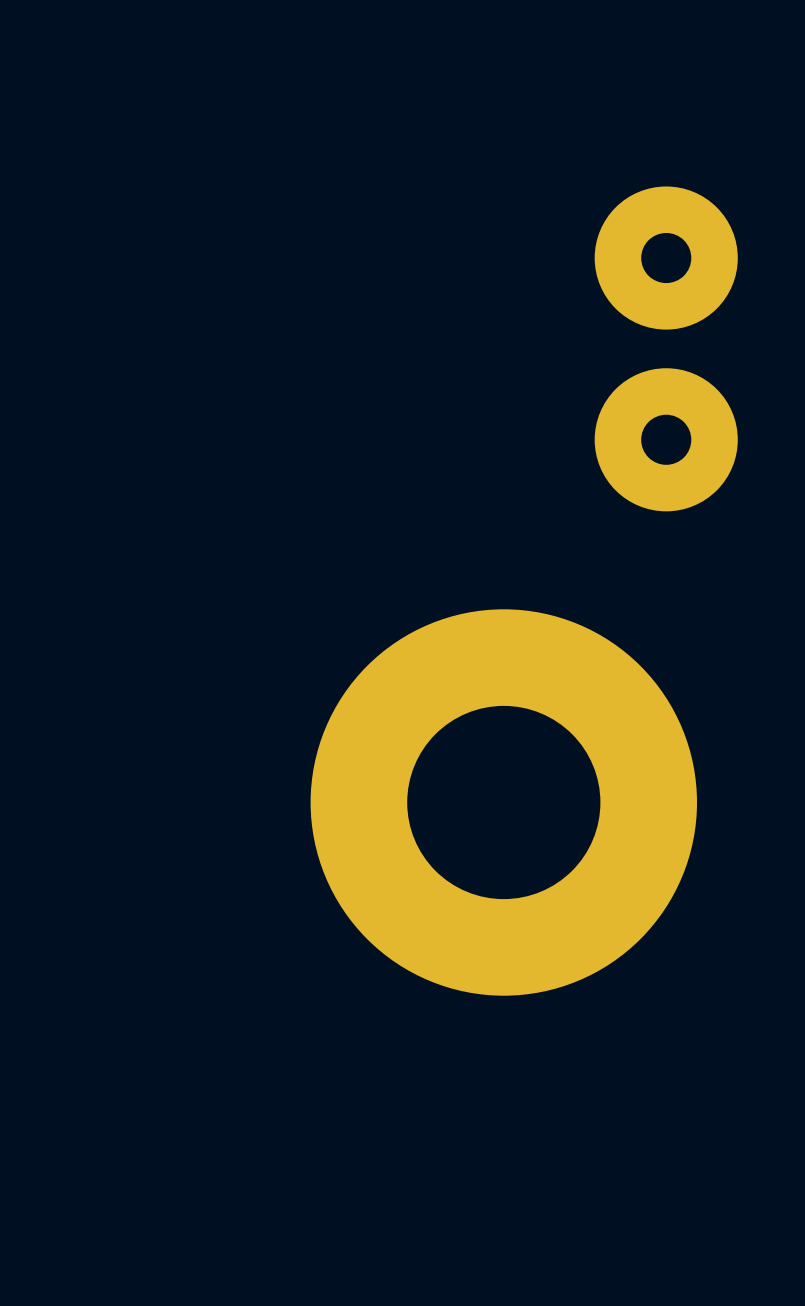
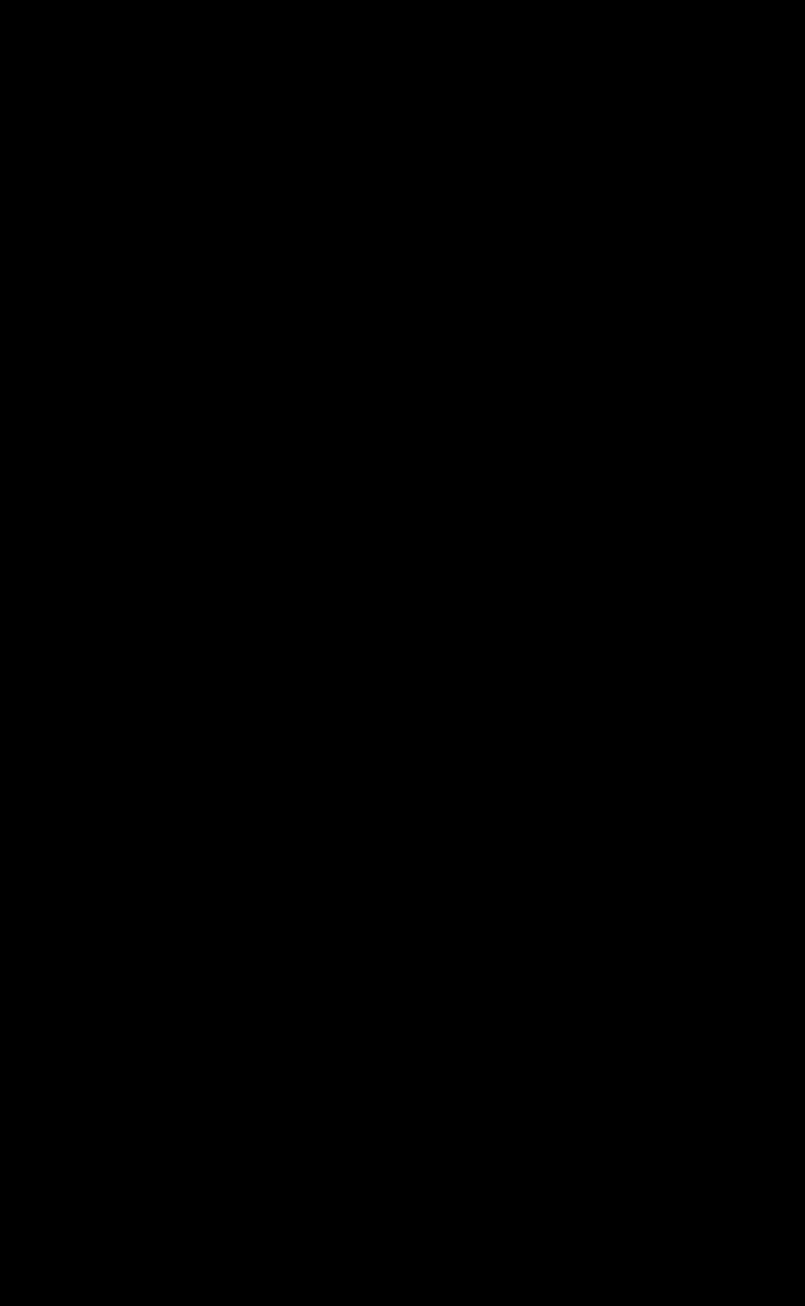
part: (666, 348) -> none
part: (503, 802) -> none

